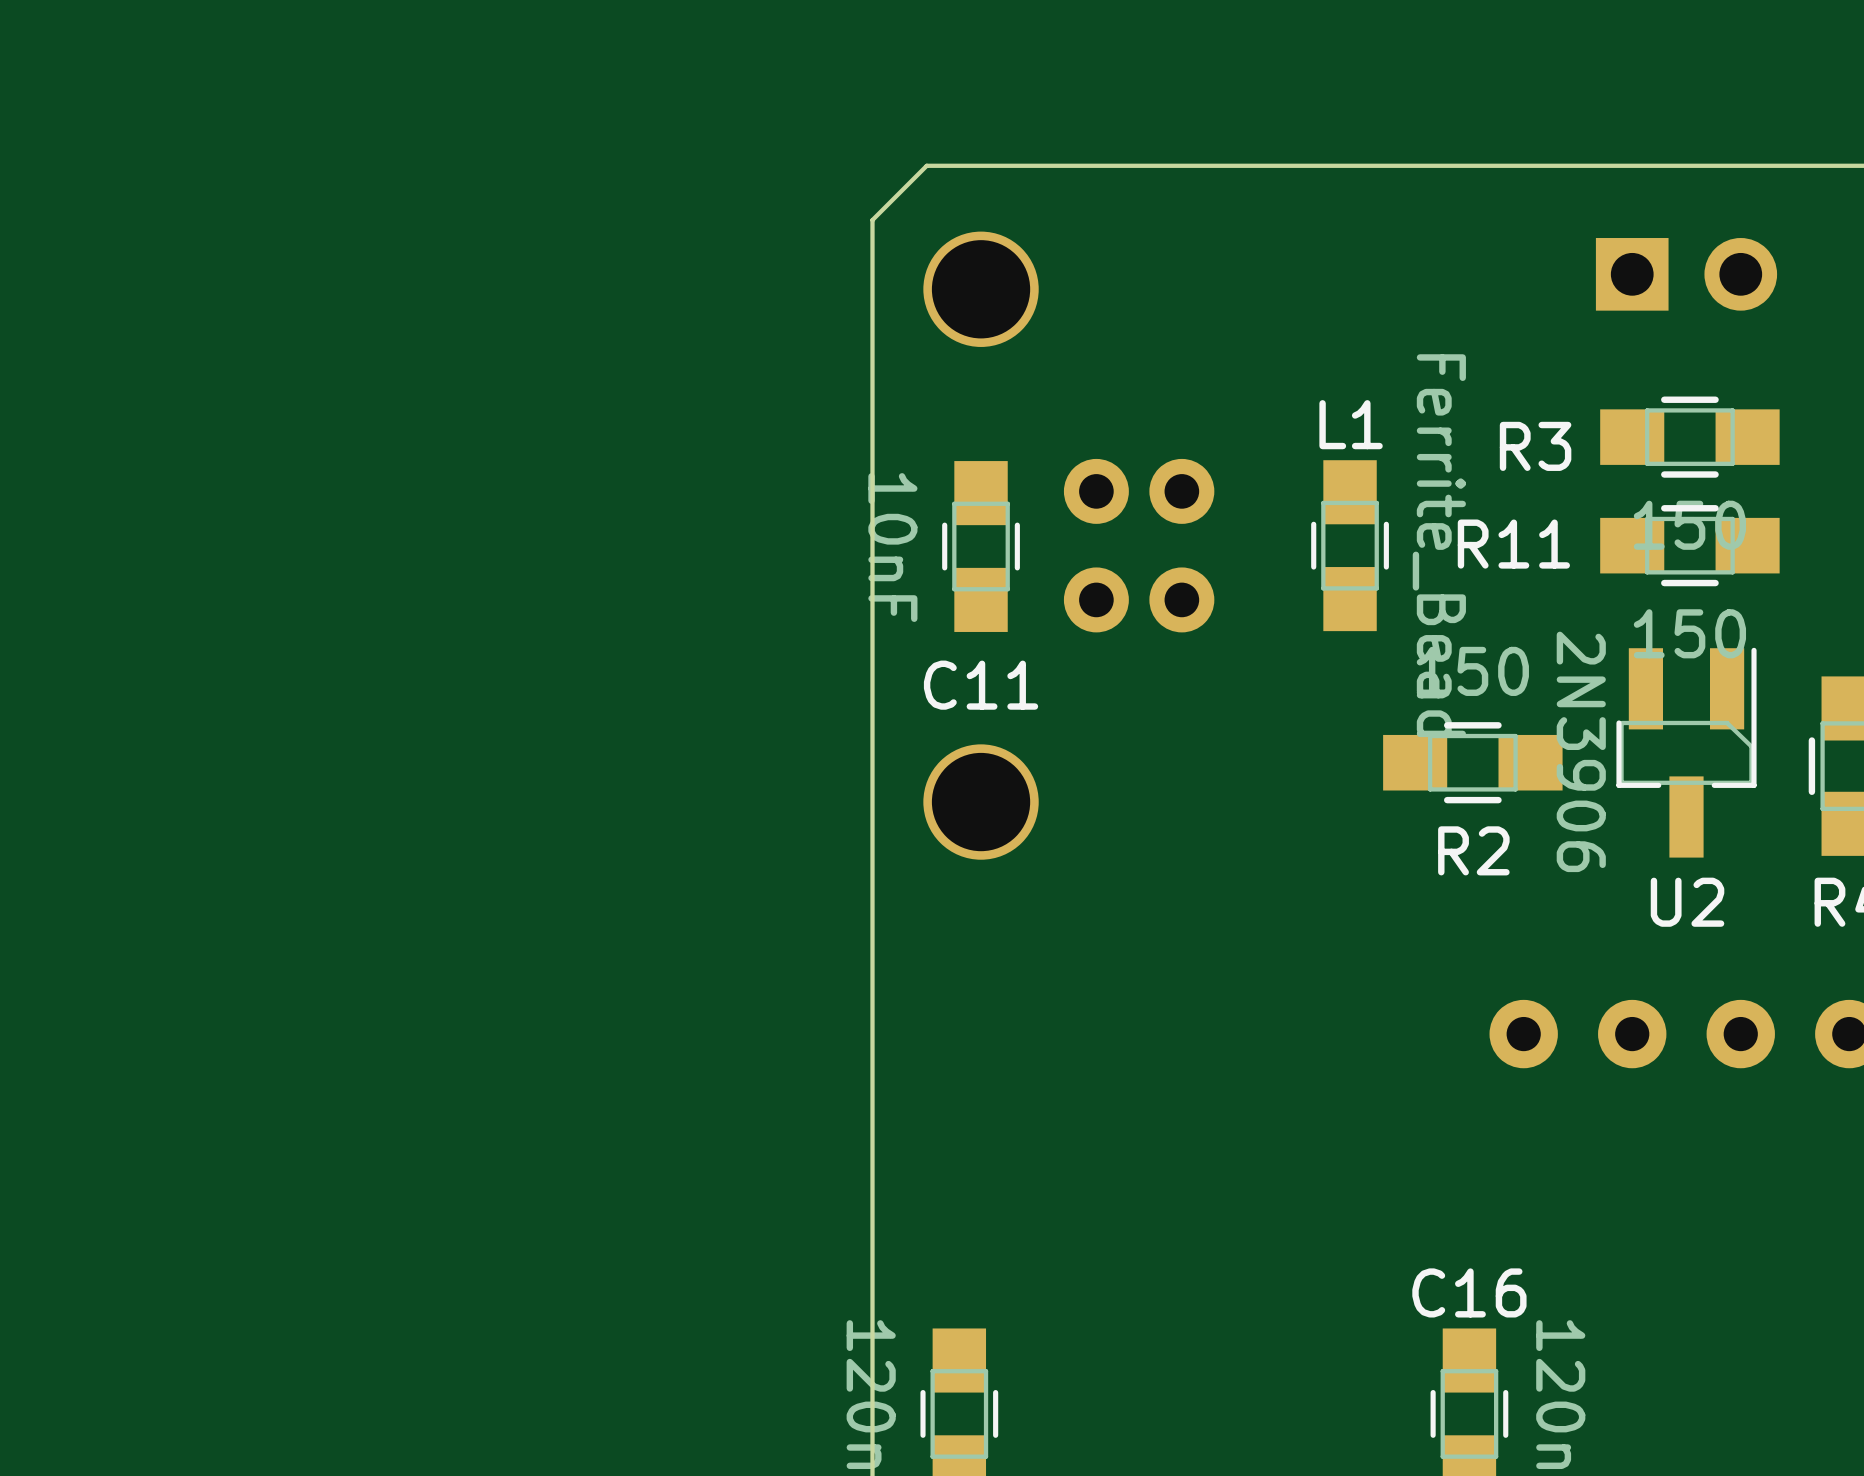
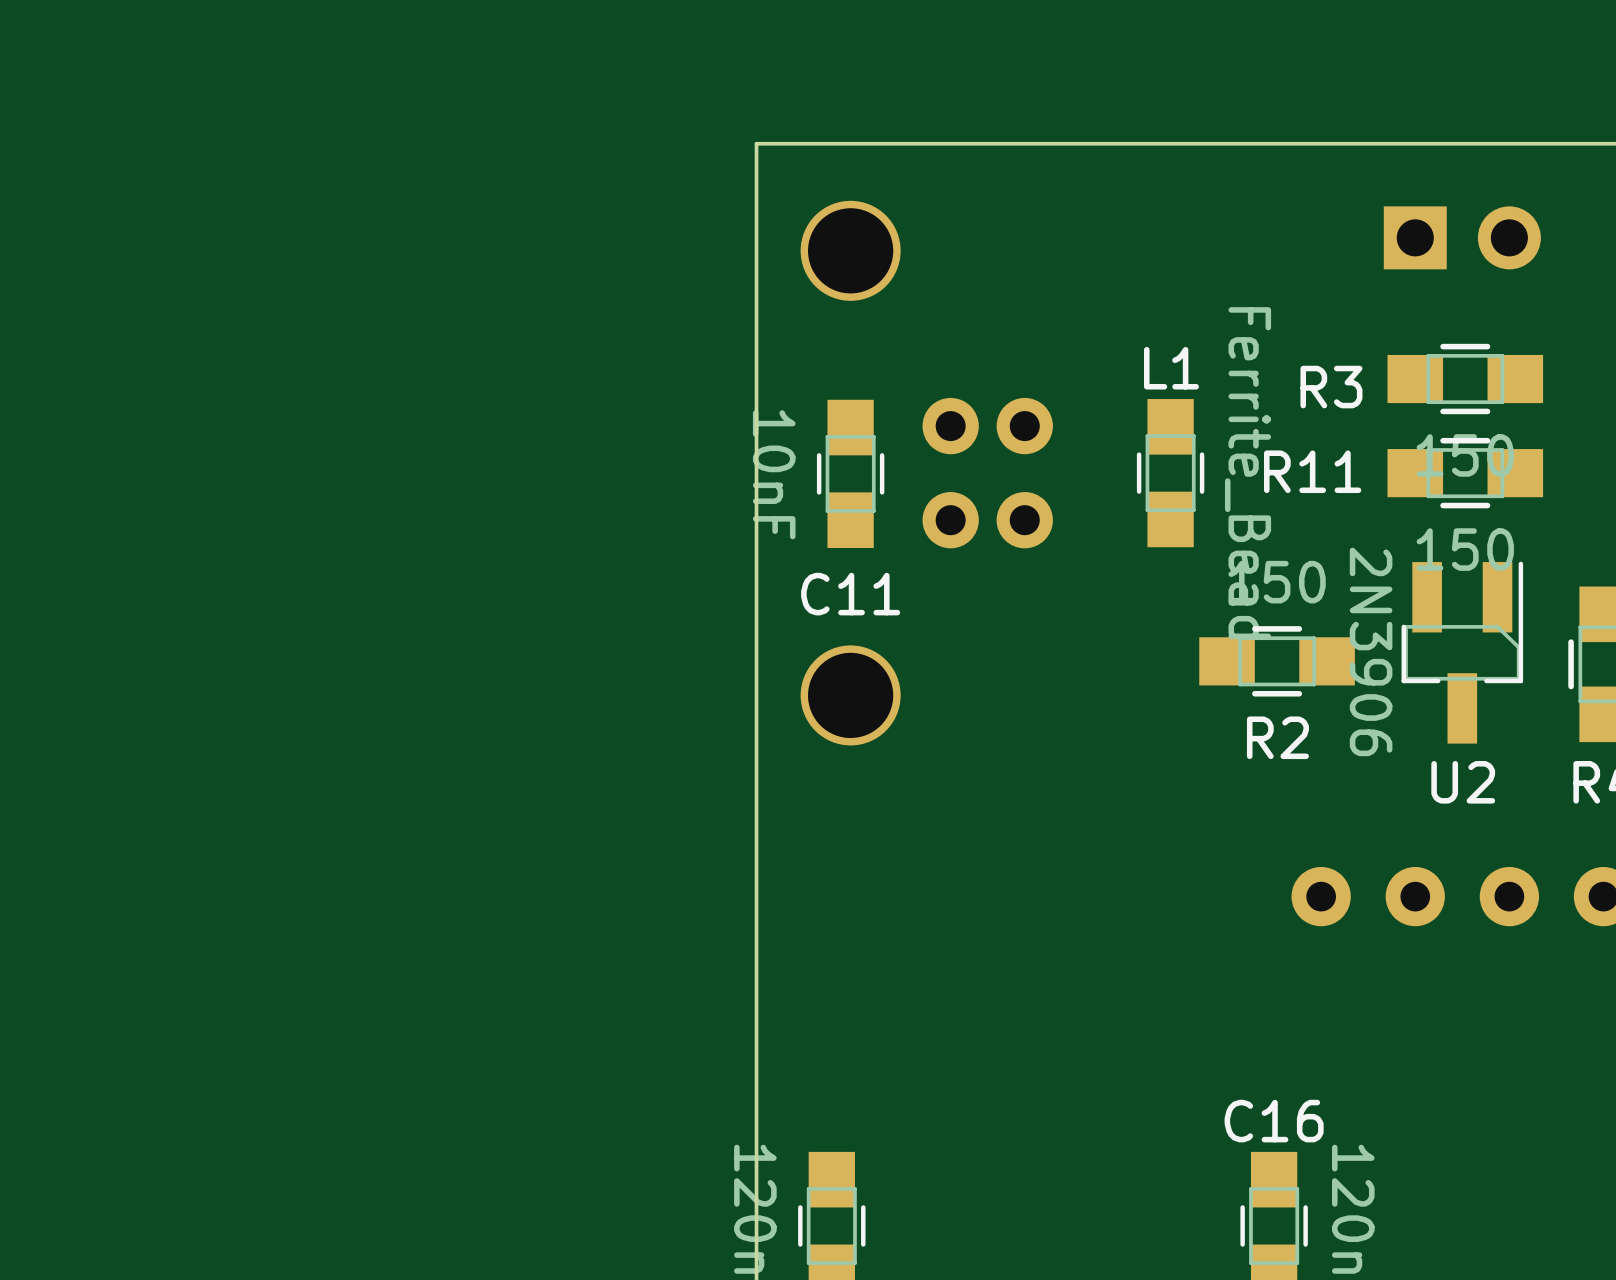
board edge: (926, 165) (872, 220) -> (803, 143) (756, 143) (756, 190)

